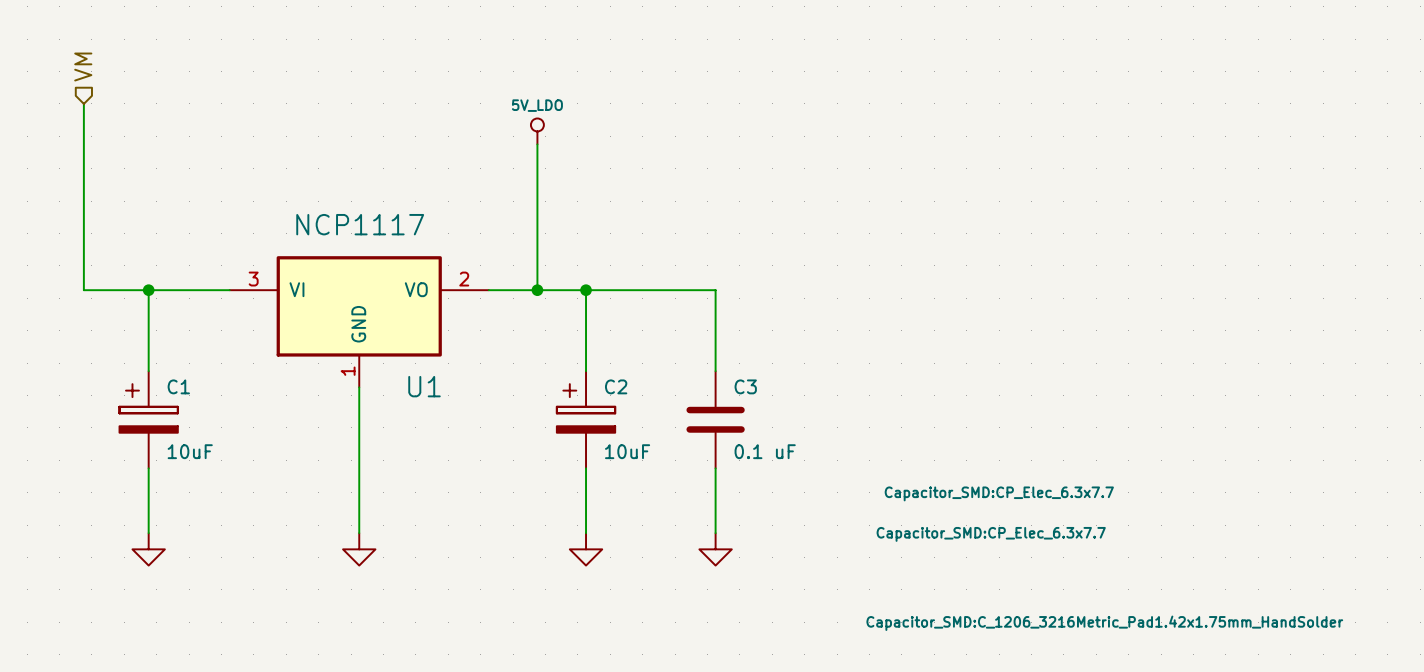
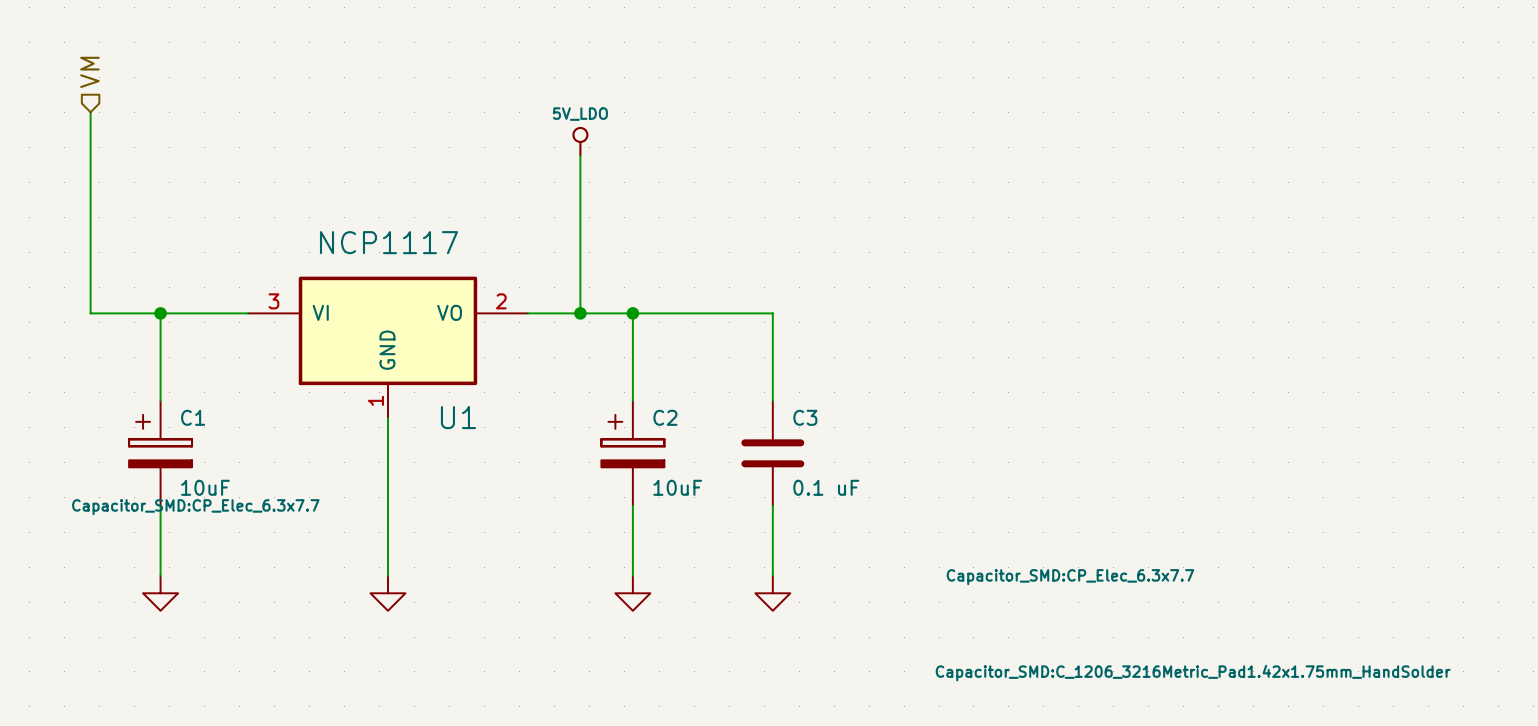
C1 text position: Capacitor_SMD:CP_Elec_6.3x7.7 (999, 493) -> Capacitor_SMD:CP_Elec_6.3x7.7 (195, 507)

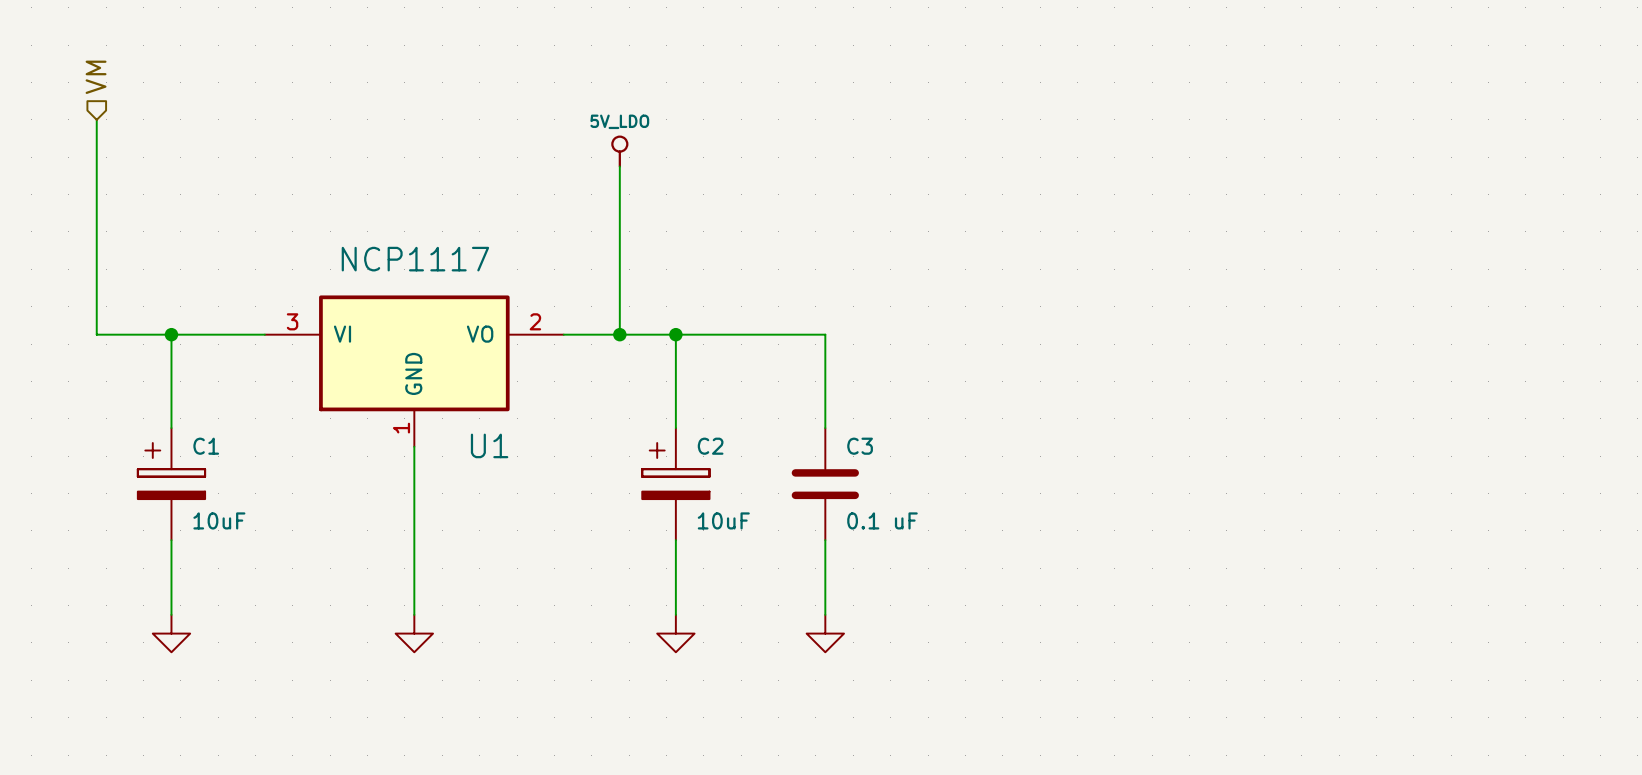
C1 text: Capacitor_SMD:CP_Elec_6.3x7.7 (195, 507) -> none
C2 text: Capacitor_SMD:CP_Elec_6.3x7.7 (1070, 577) -> none
C3 text: Capacitor_SMD:C_1206_3216Metric_Pad1.42x1.75mm_HandSolder (1193, 673) -> none

